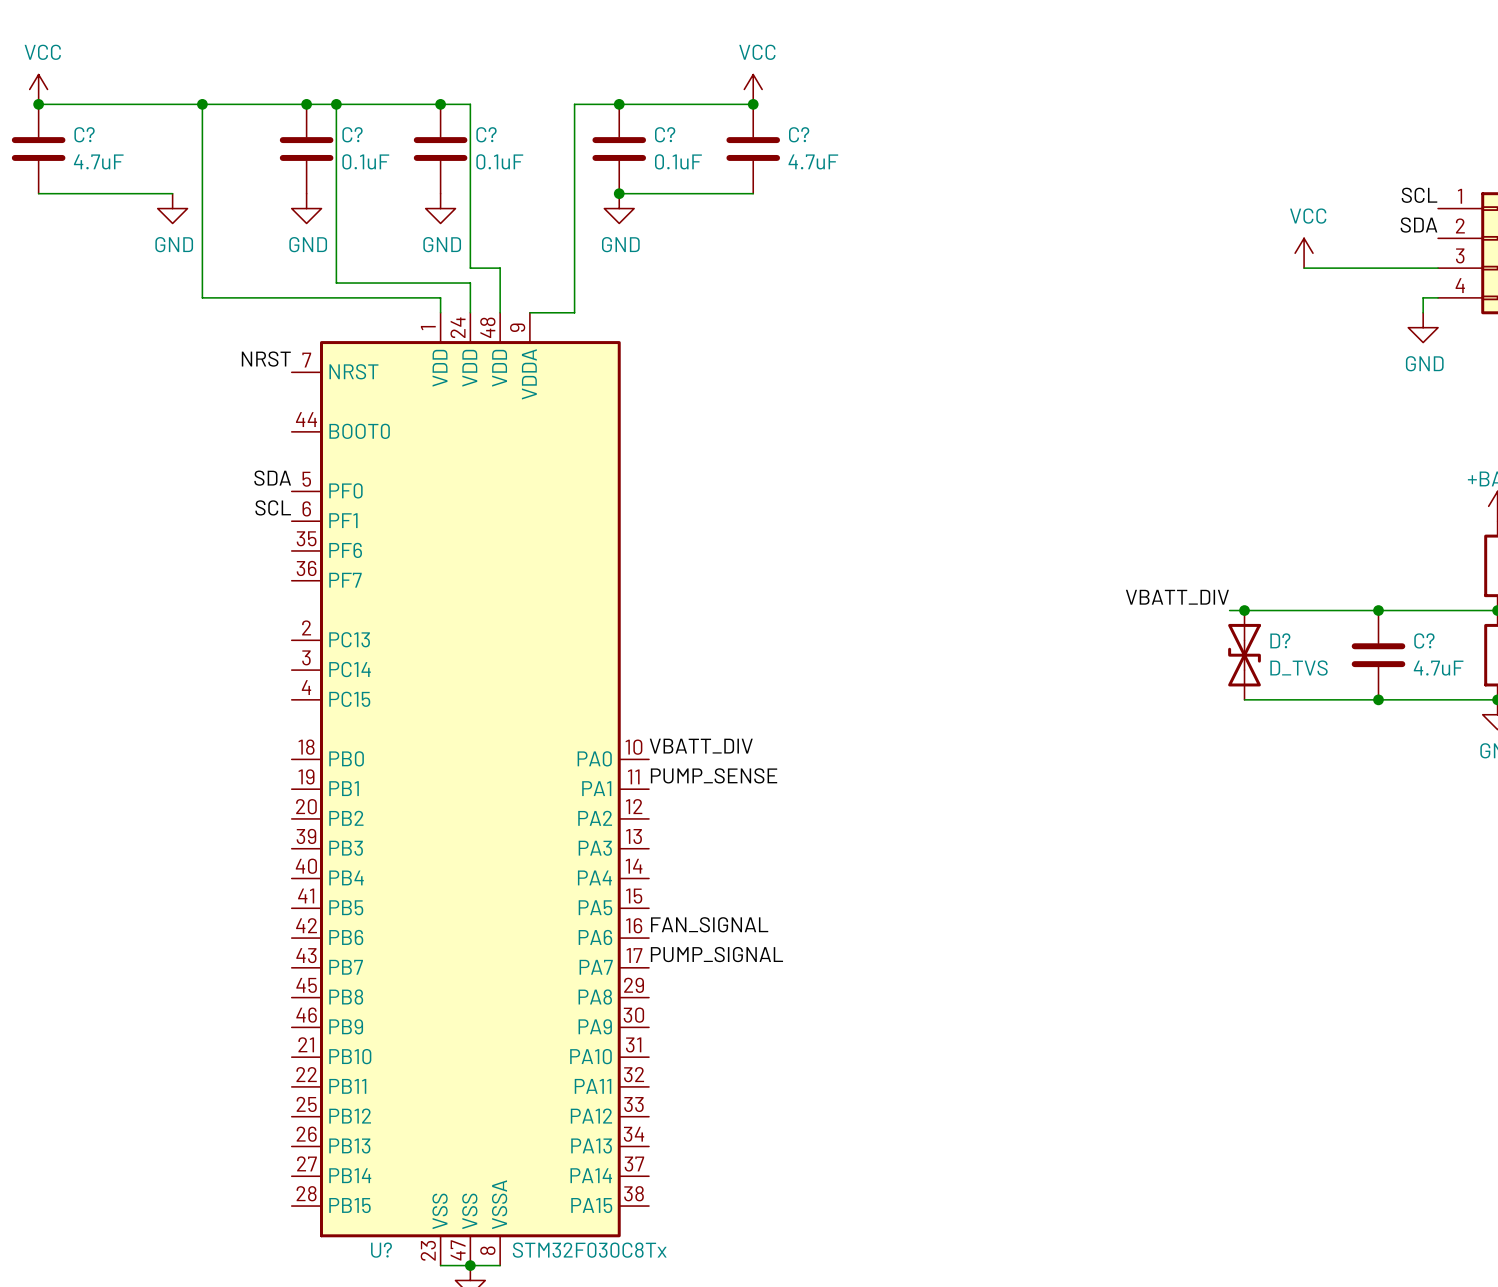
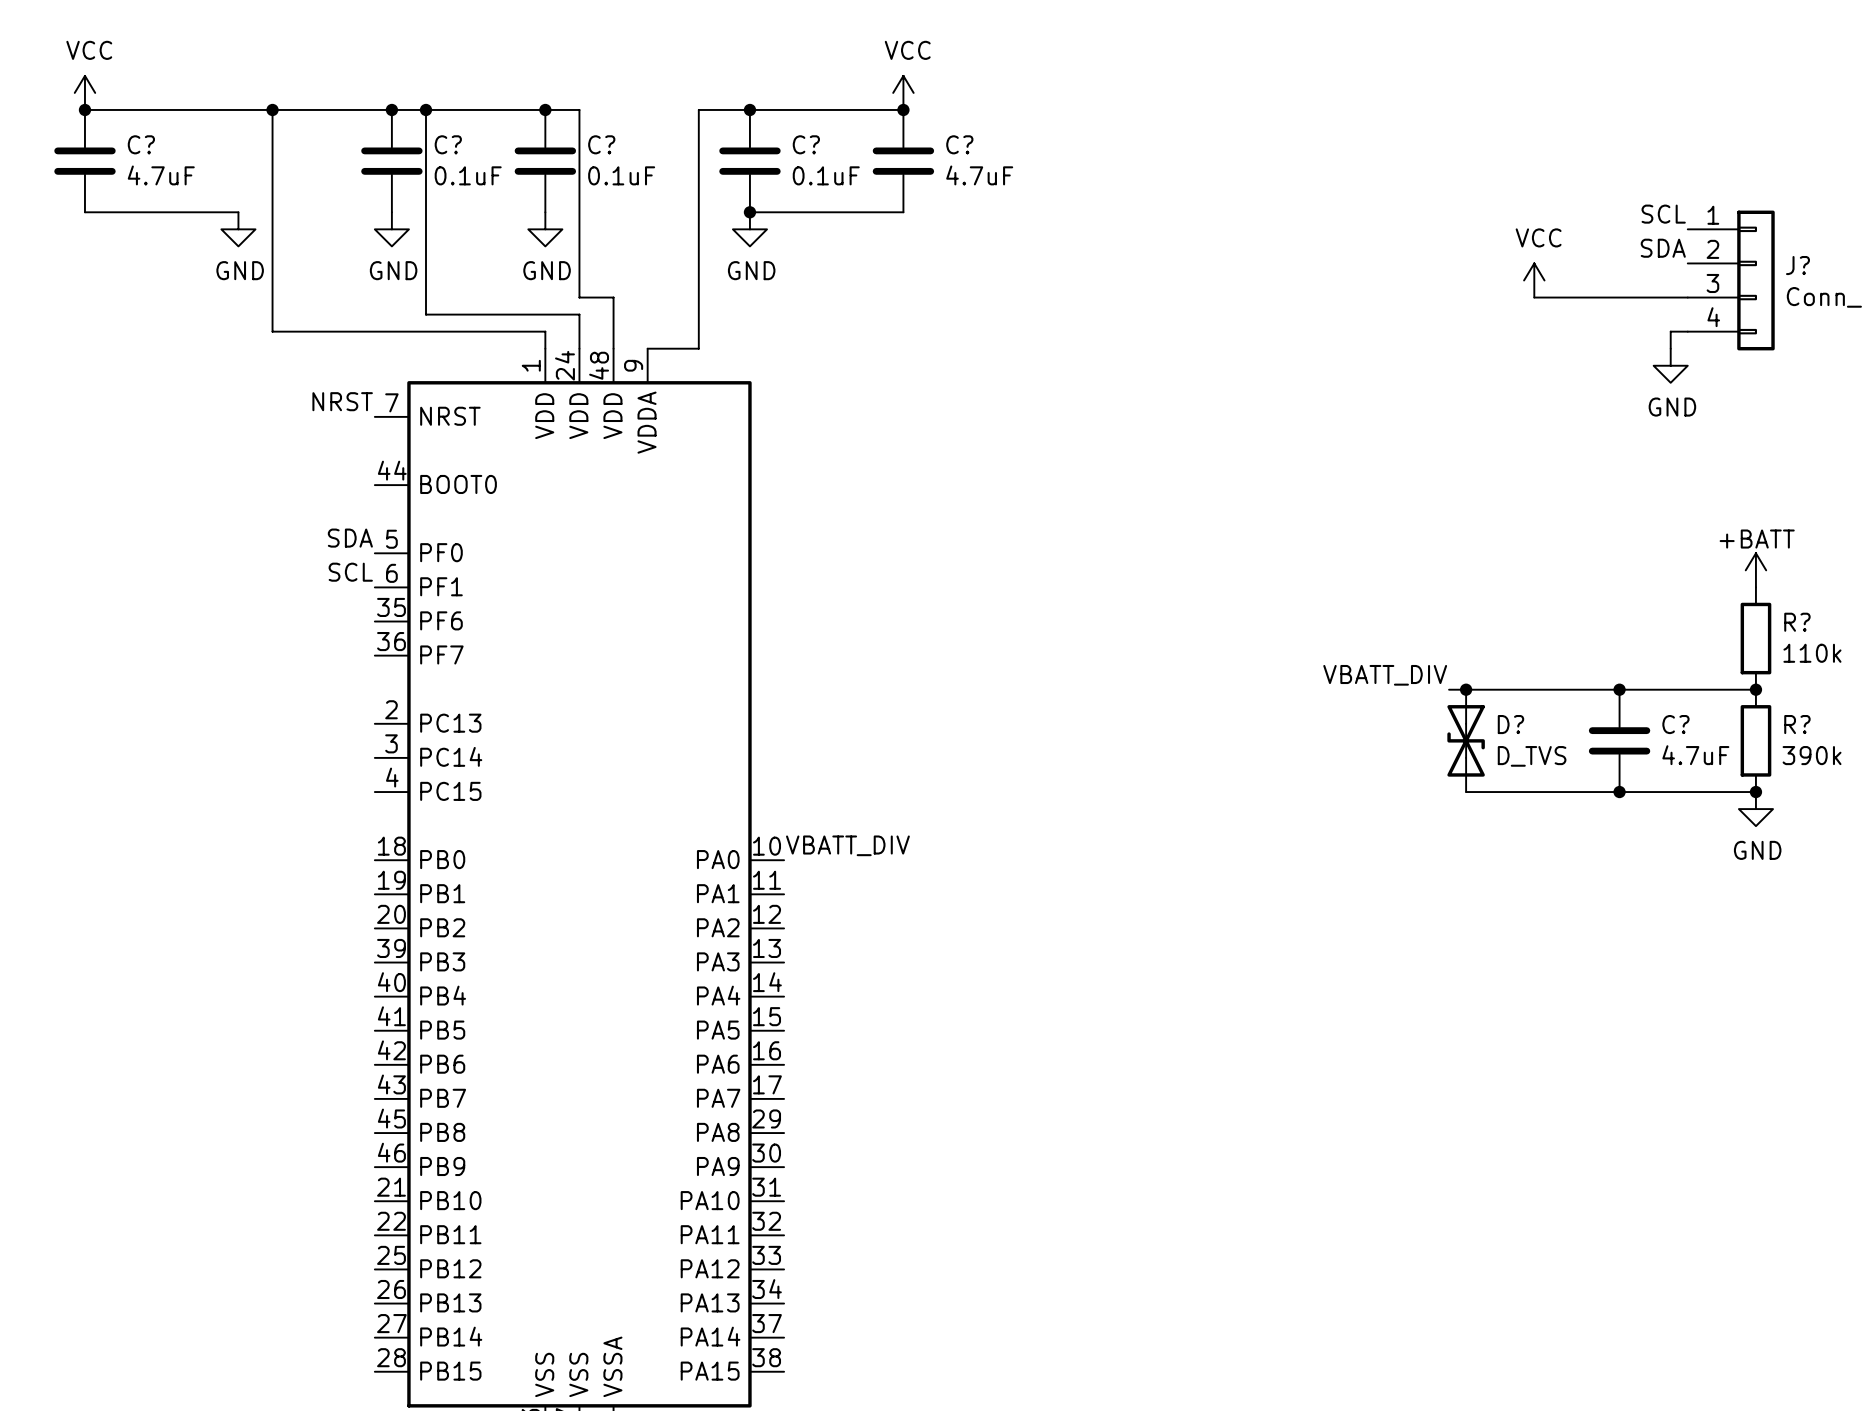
label: PUMP_SENSE (714, 775) -> none
label: FAN_SIGNAL (709, 924) -> none
label: PUMP_SIGNAL (716, 954) -> none

